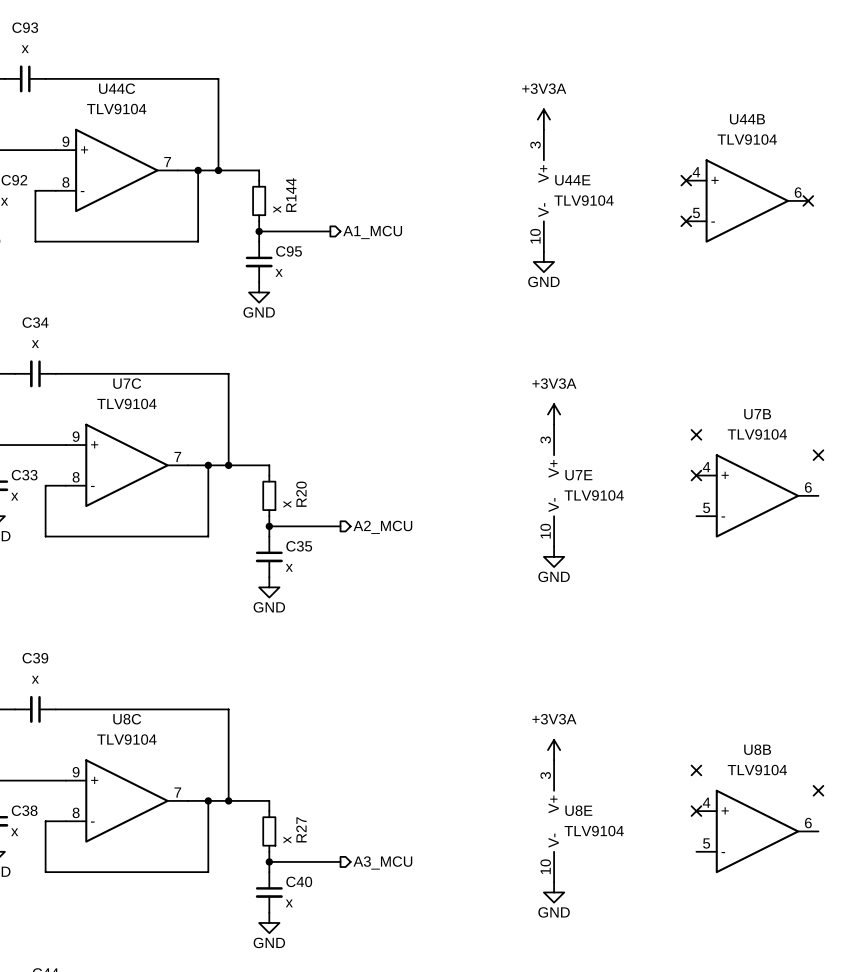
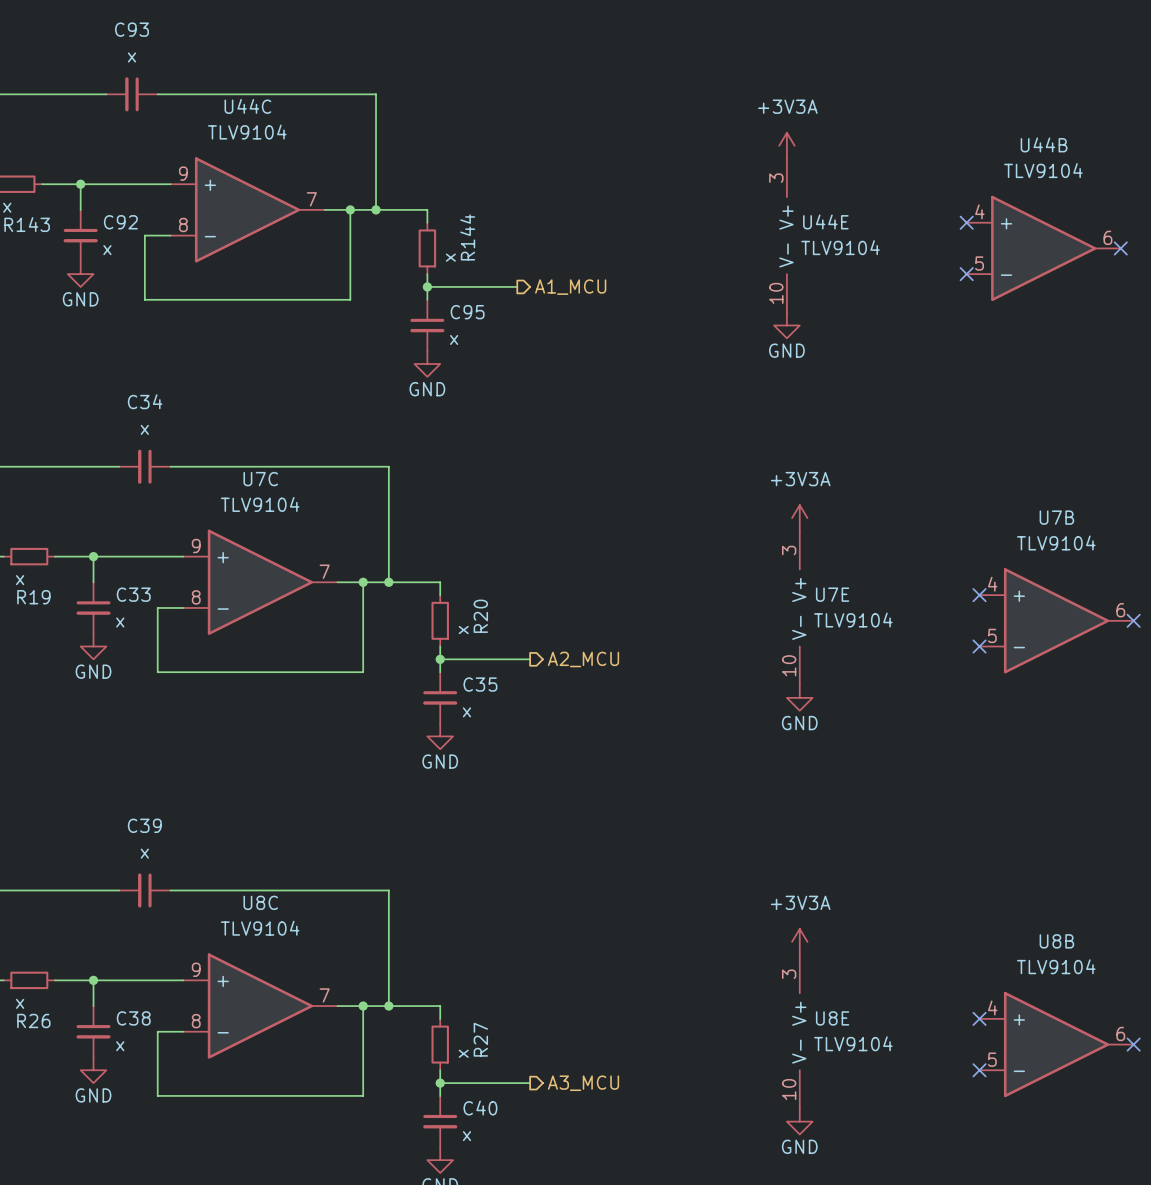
no-connect mark: (696, 434) -> none
no-connect mark position: (818, 455) -> (1133, 620)
no-connect mark: none -> (979, 646)
no-connect mark: (696, 770) -> none
no-connect mark position: (818, 790) -> (1133, 1044)
no-connect mark: none -> (979, 1070)

